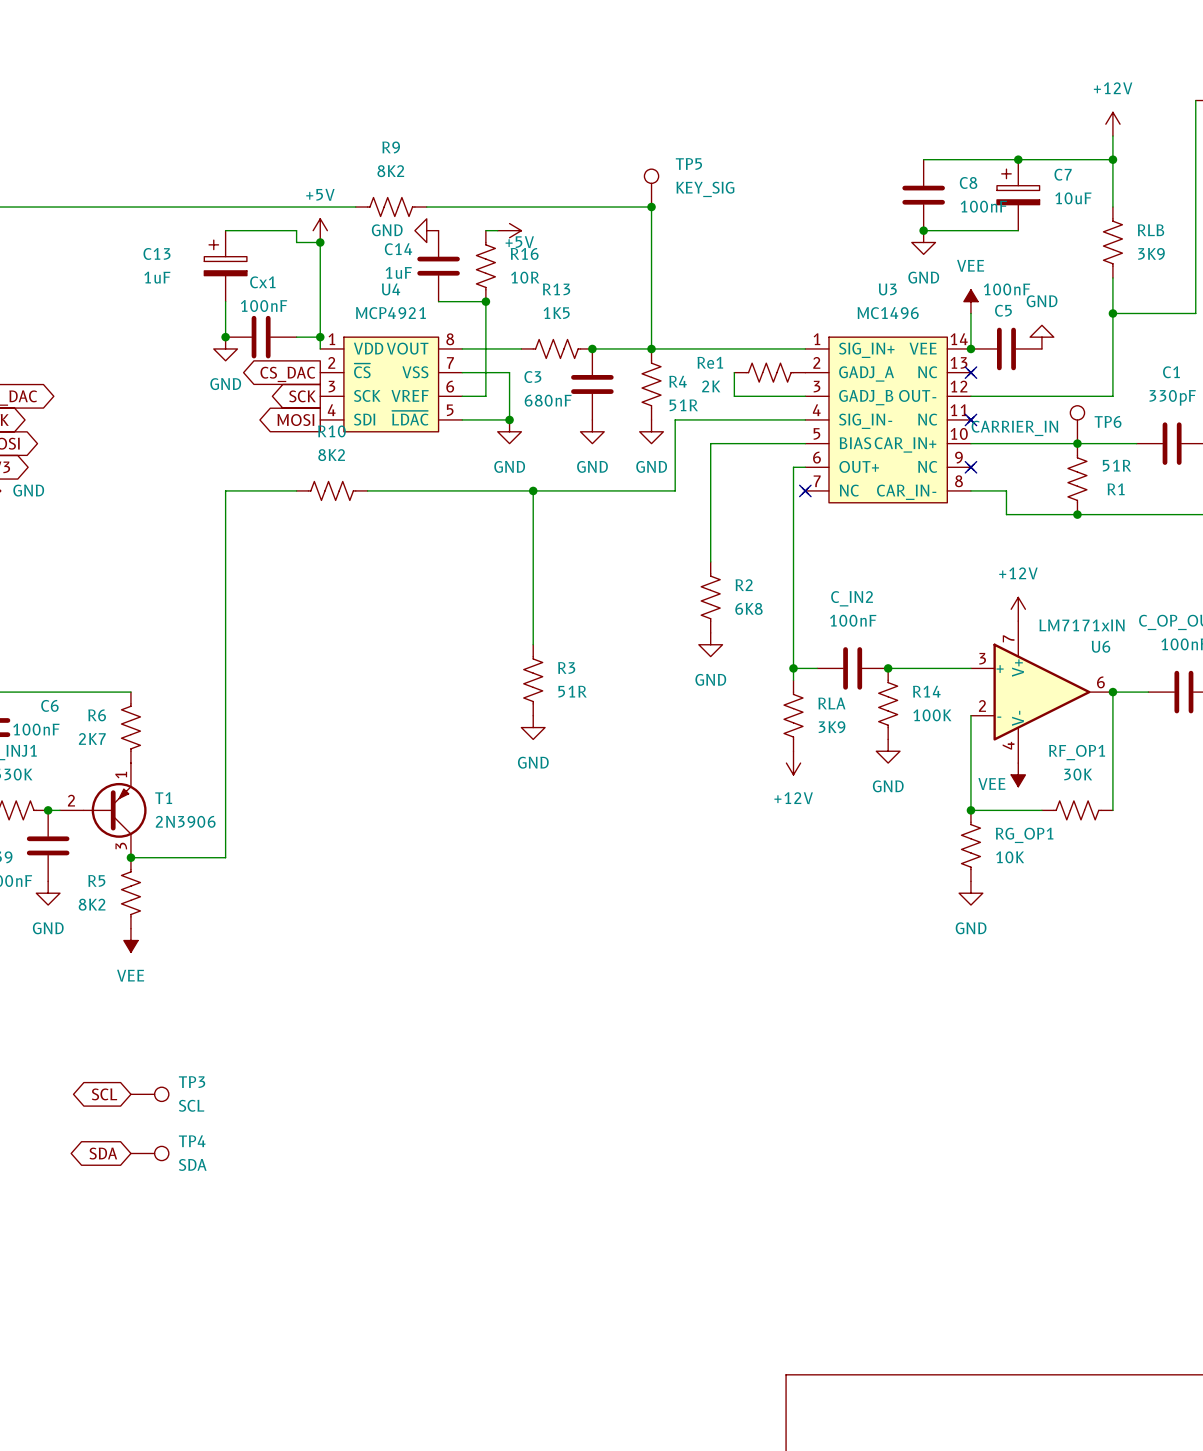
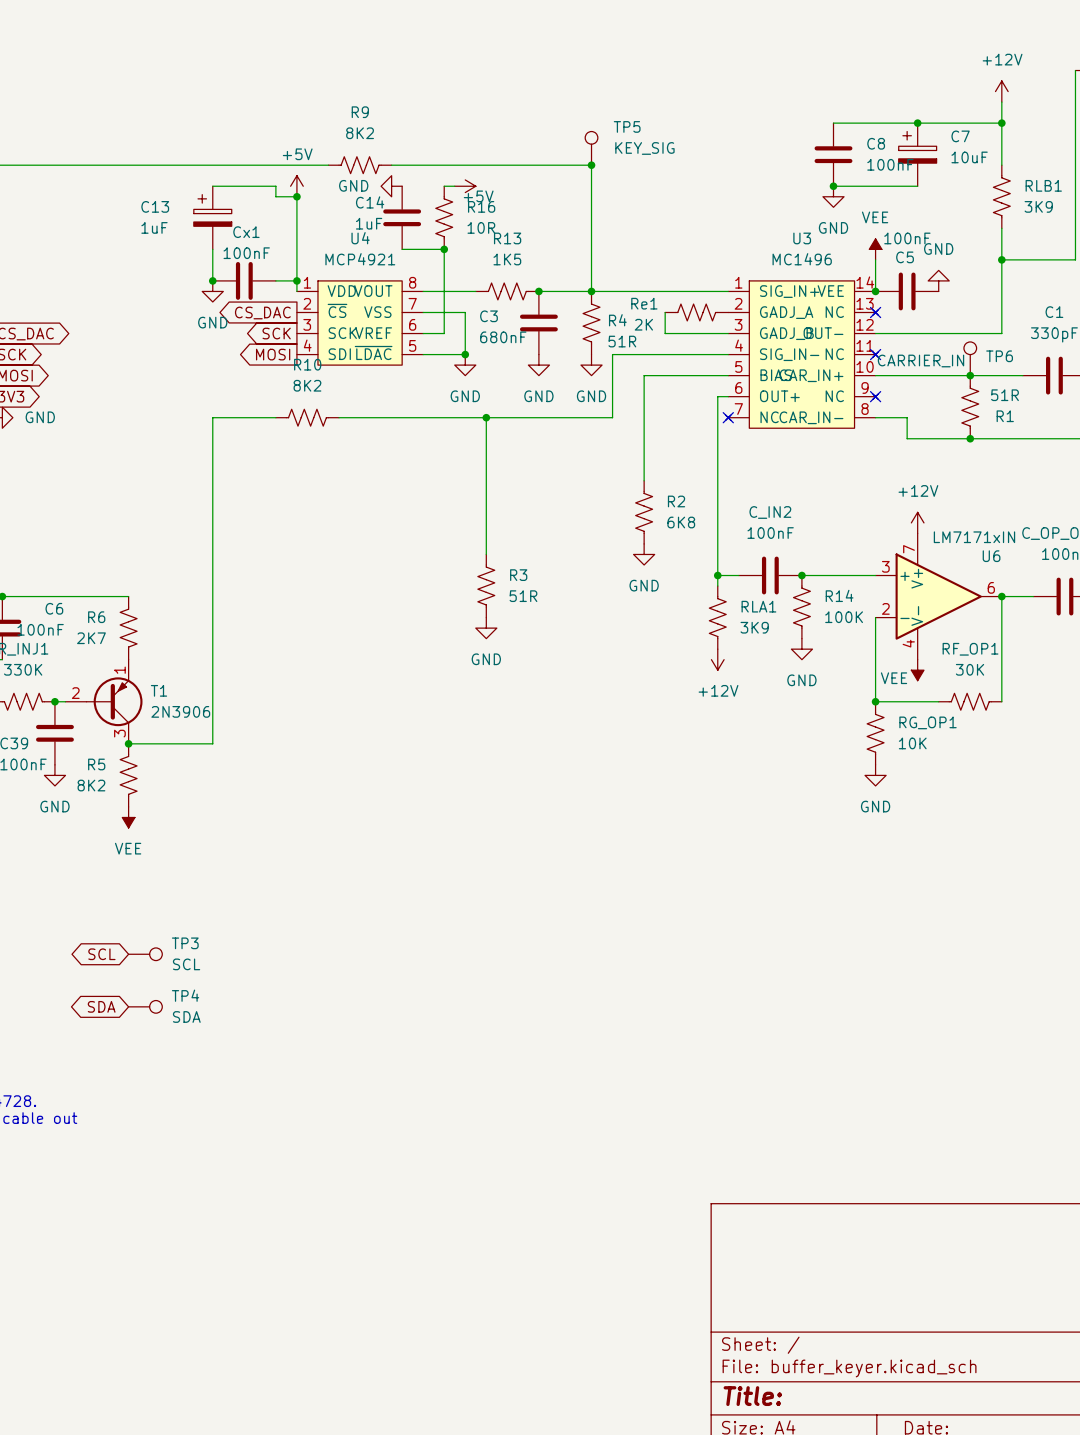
RLB name: RLB (1150, 230) -> RLB1 (1043, 185)
RLA name: RLA (831, 703) -> RLA1 (758, 606)

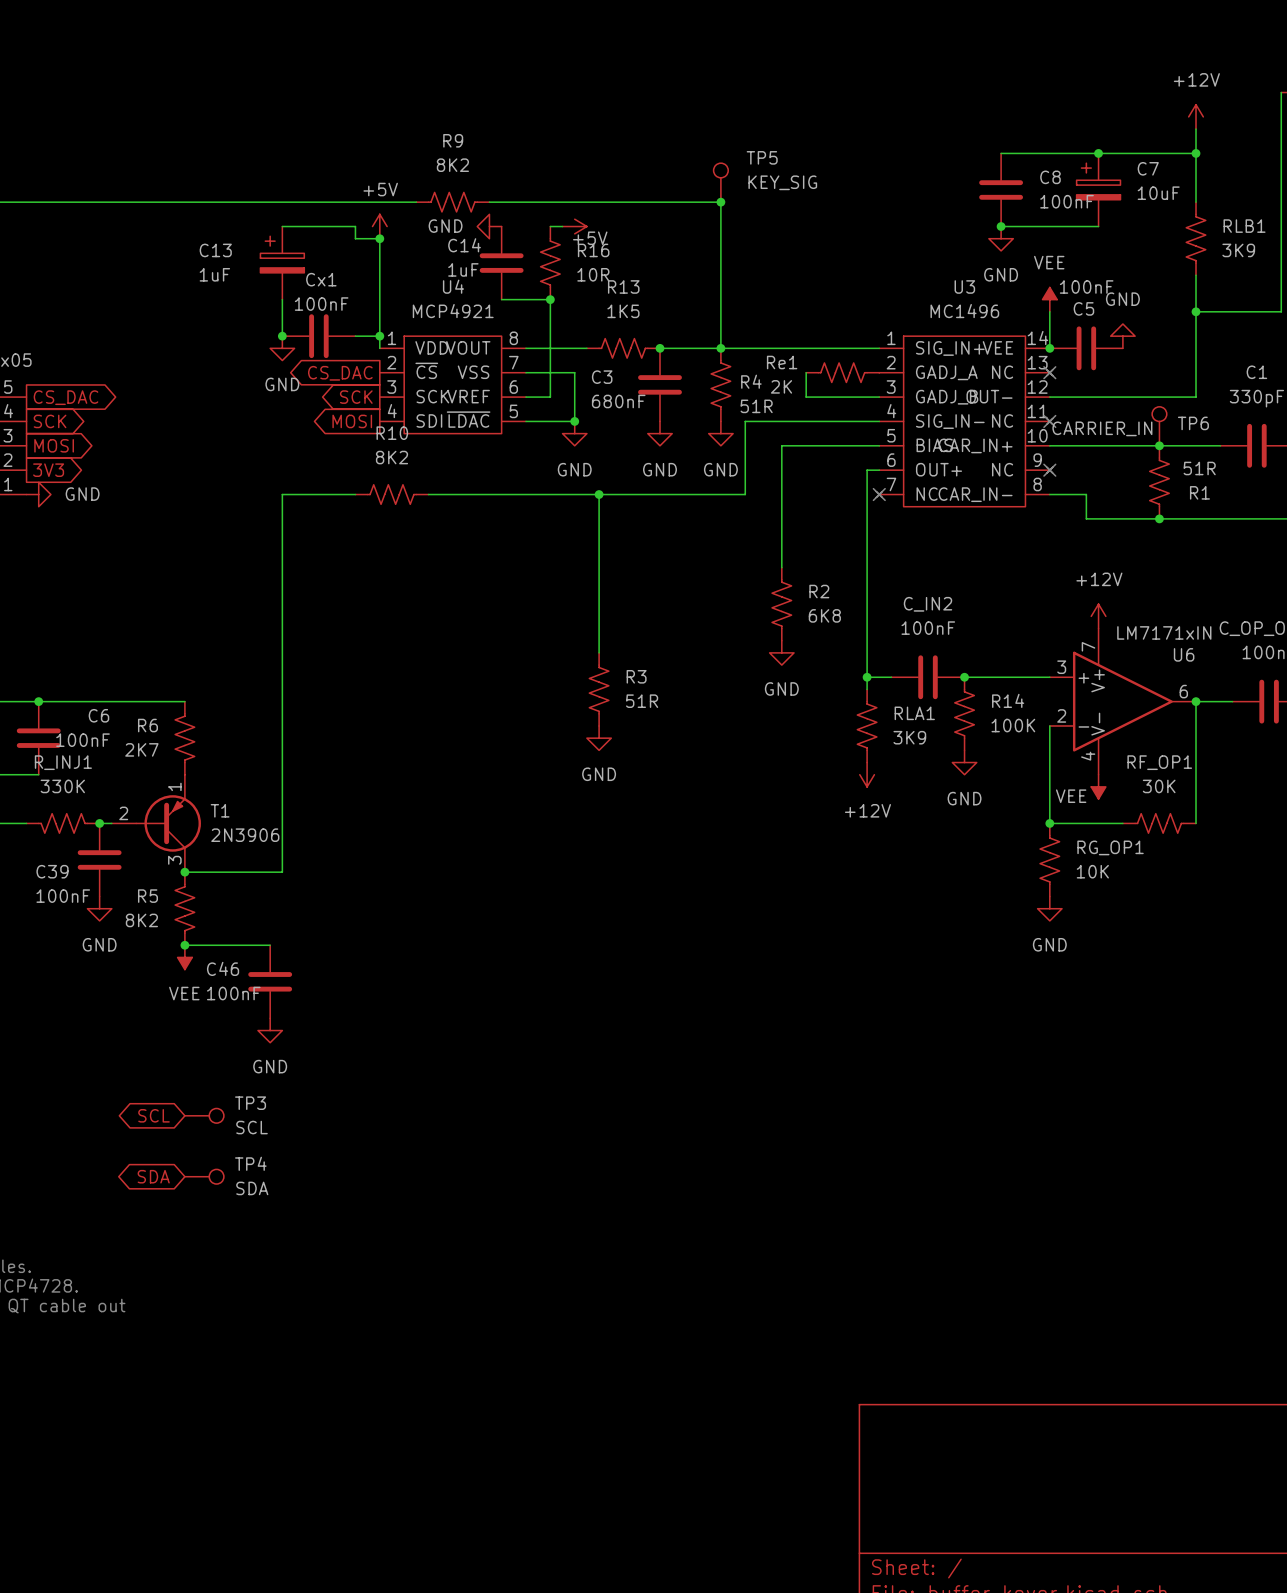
wire: none -> (184, 945) (270, 945)
junction: none -> (184, 945)
C46: none -> 100nF (270, 981)
power symbol: none -> GND (270, 1030)

